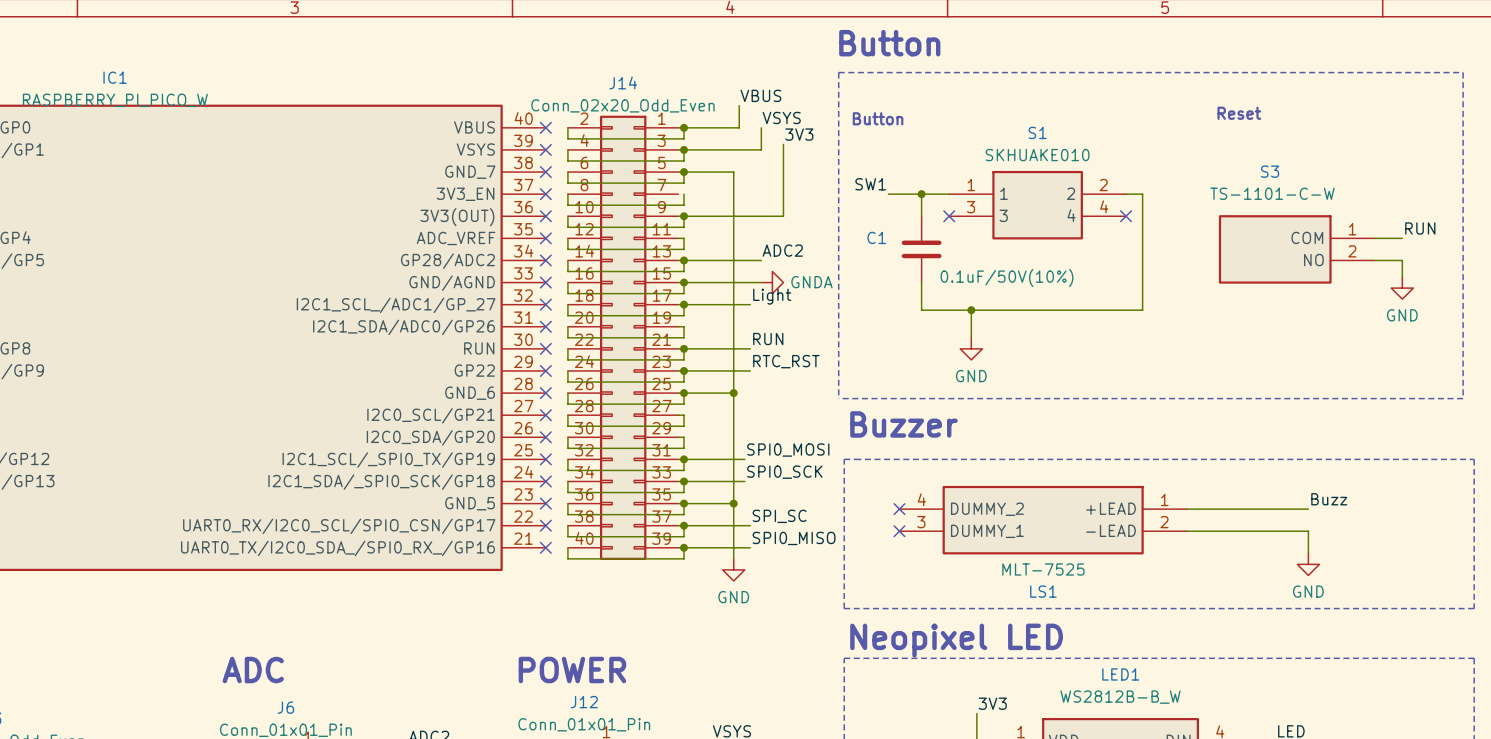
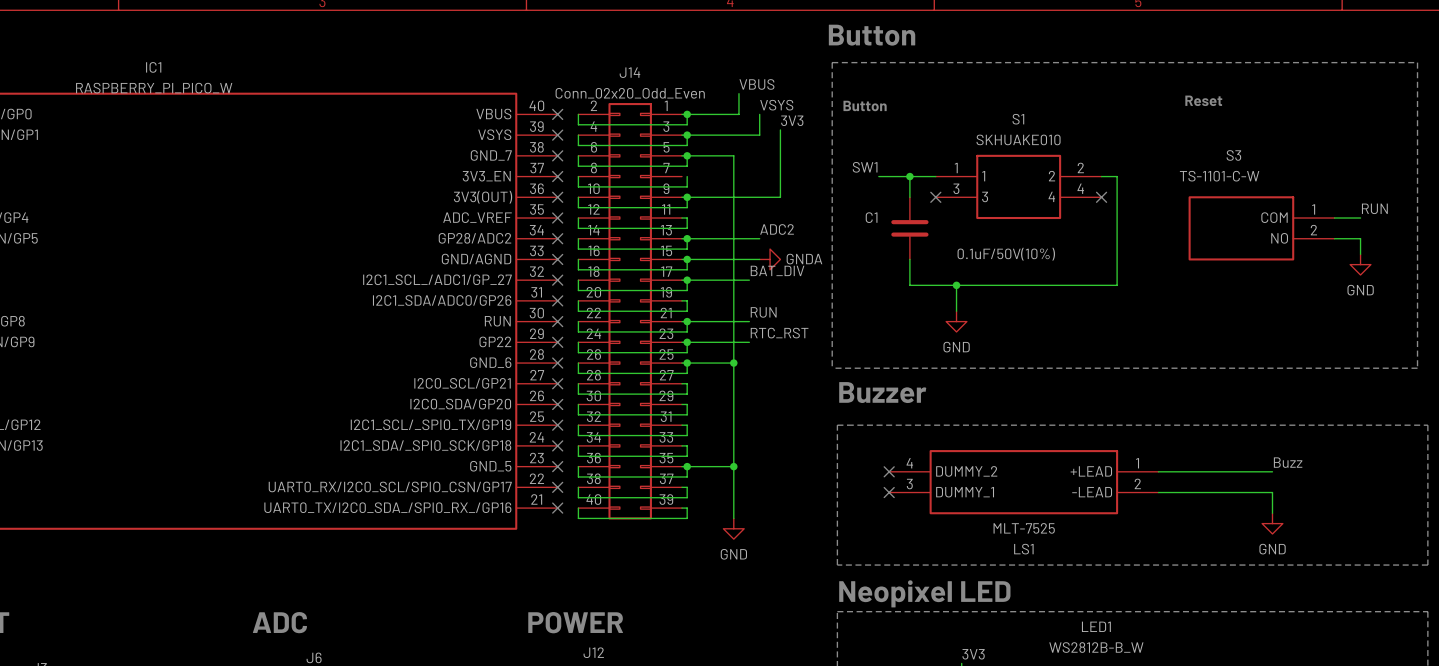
label: Light (772, 296) -> BAT_DIV (777, 270)
label: SPI0_MOSI (788, 450) -> none
wire: (683, 459) (744, 459) -> none
junction: (683, 459) -> none
label: SPI0_SCK (784, 472) -> none
wire: (683, 481) (744, 481) -> none
junction: (683, 481) -> none
label: SPI_SC (779, 516) -> none
wire: (683, 525) (750, 525) -> none
junction: (683, 525) -> none
label: SPI0_MISO (794, 538) -> none
wire: (683, 547) (750, 547) -> none
junction: (683, 547) -> none

